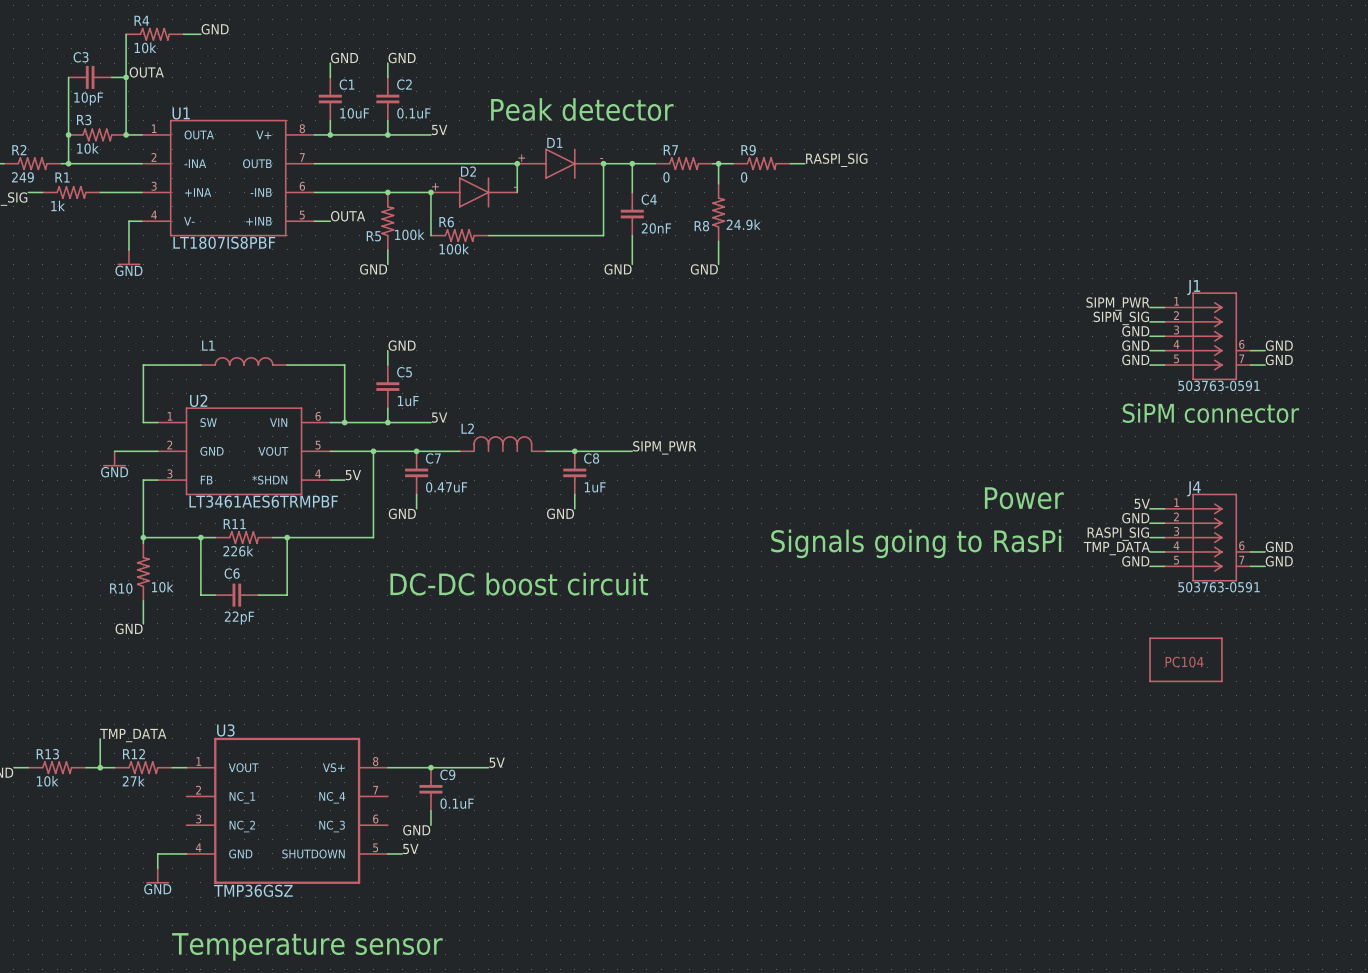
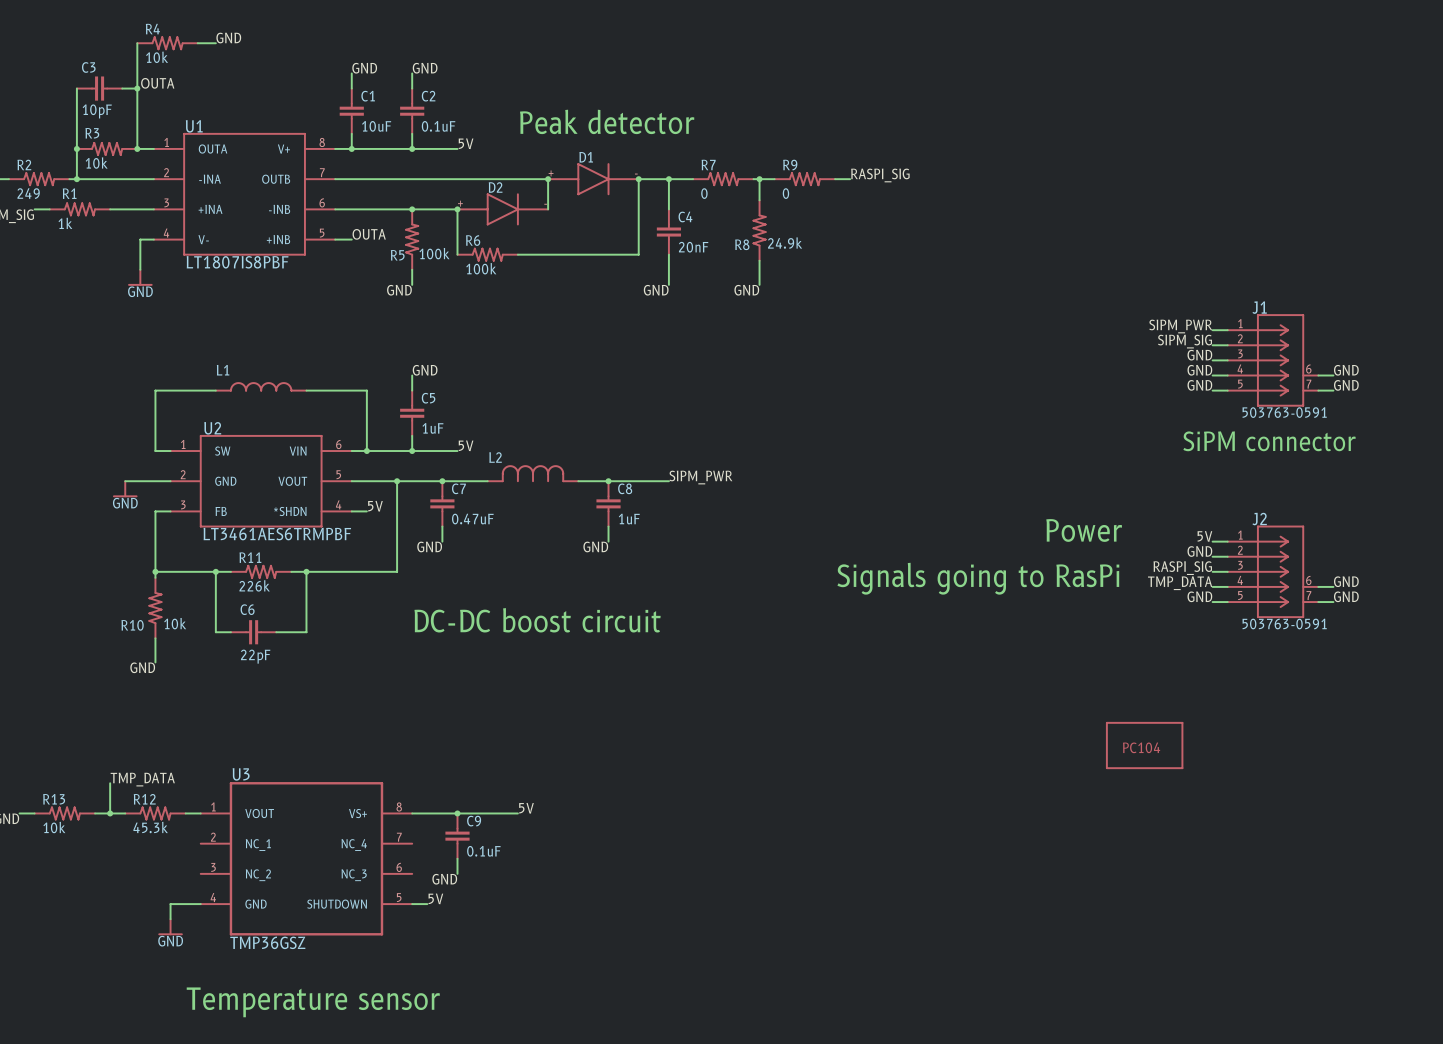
J4 name: J4 (1193, 488) -> J2 (1259, 519)
part position: (1185, 659) -> (1144, 745)
R12 value: 27k (133, 781) -> 45.3k (150, 827)

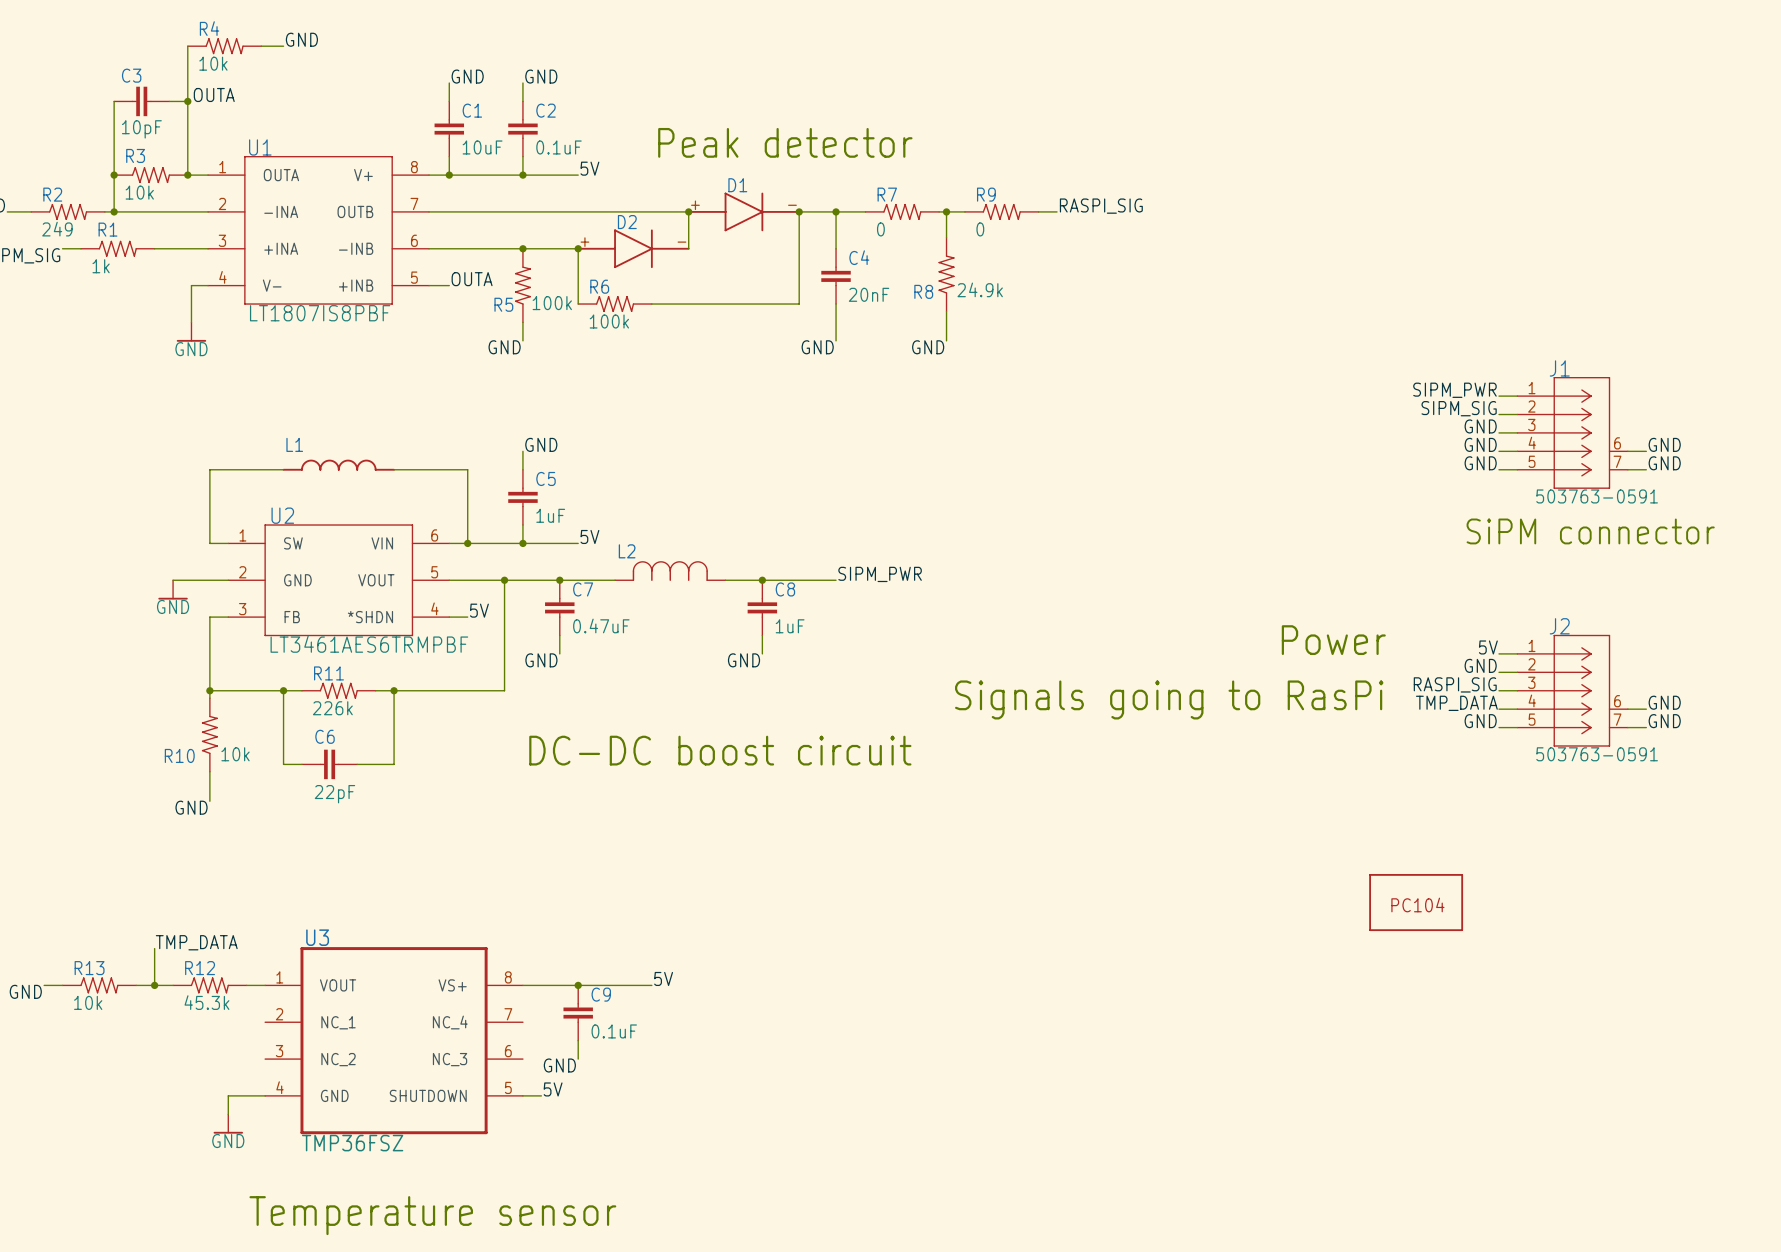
U3 value: TMP36GSZ (267, 942) -> TMP36FSZ (352, 1143)

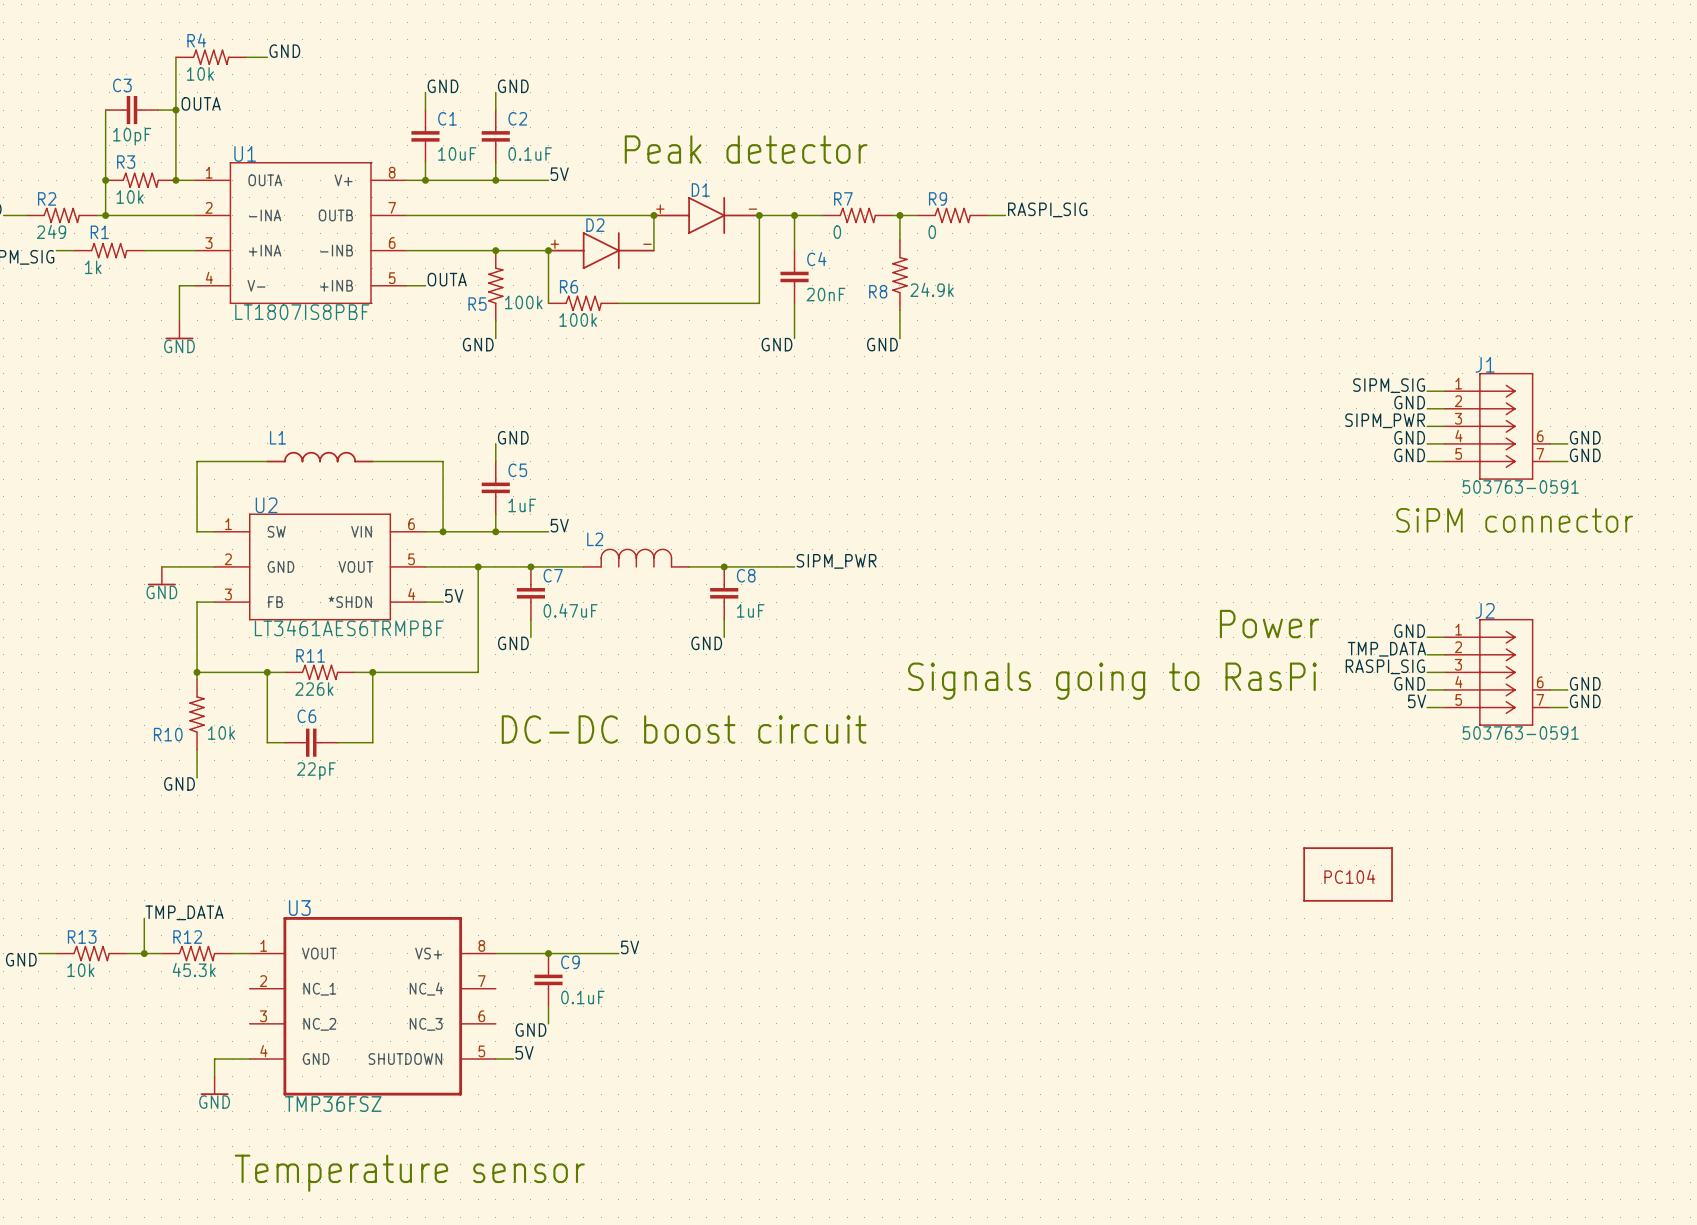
label: SIPM_PWR (1454, 390) -> SIPM_SIG (1389, 385)
label: SIPM_SIG (1459, 408) -> GND (1409, 402)
label: GND (1480, 426) -> SIPM_PWR (1385, 420)
label: 5V (1488, 647) -> GND (1409, 631)
label: GND (1480, 665) -> TMP_DATA (1386, 649)
label: TMP_DATA (1456, 703) -> GND (1409, 683)
label: GND (1480, 721) -> 5V (1417, 701)

